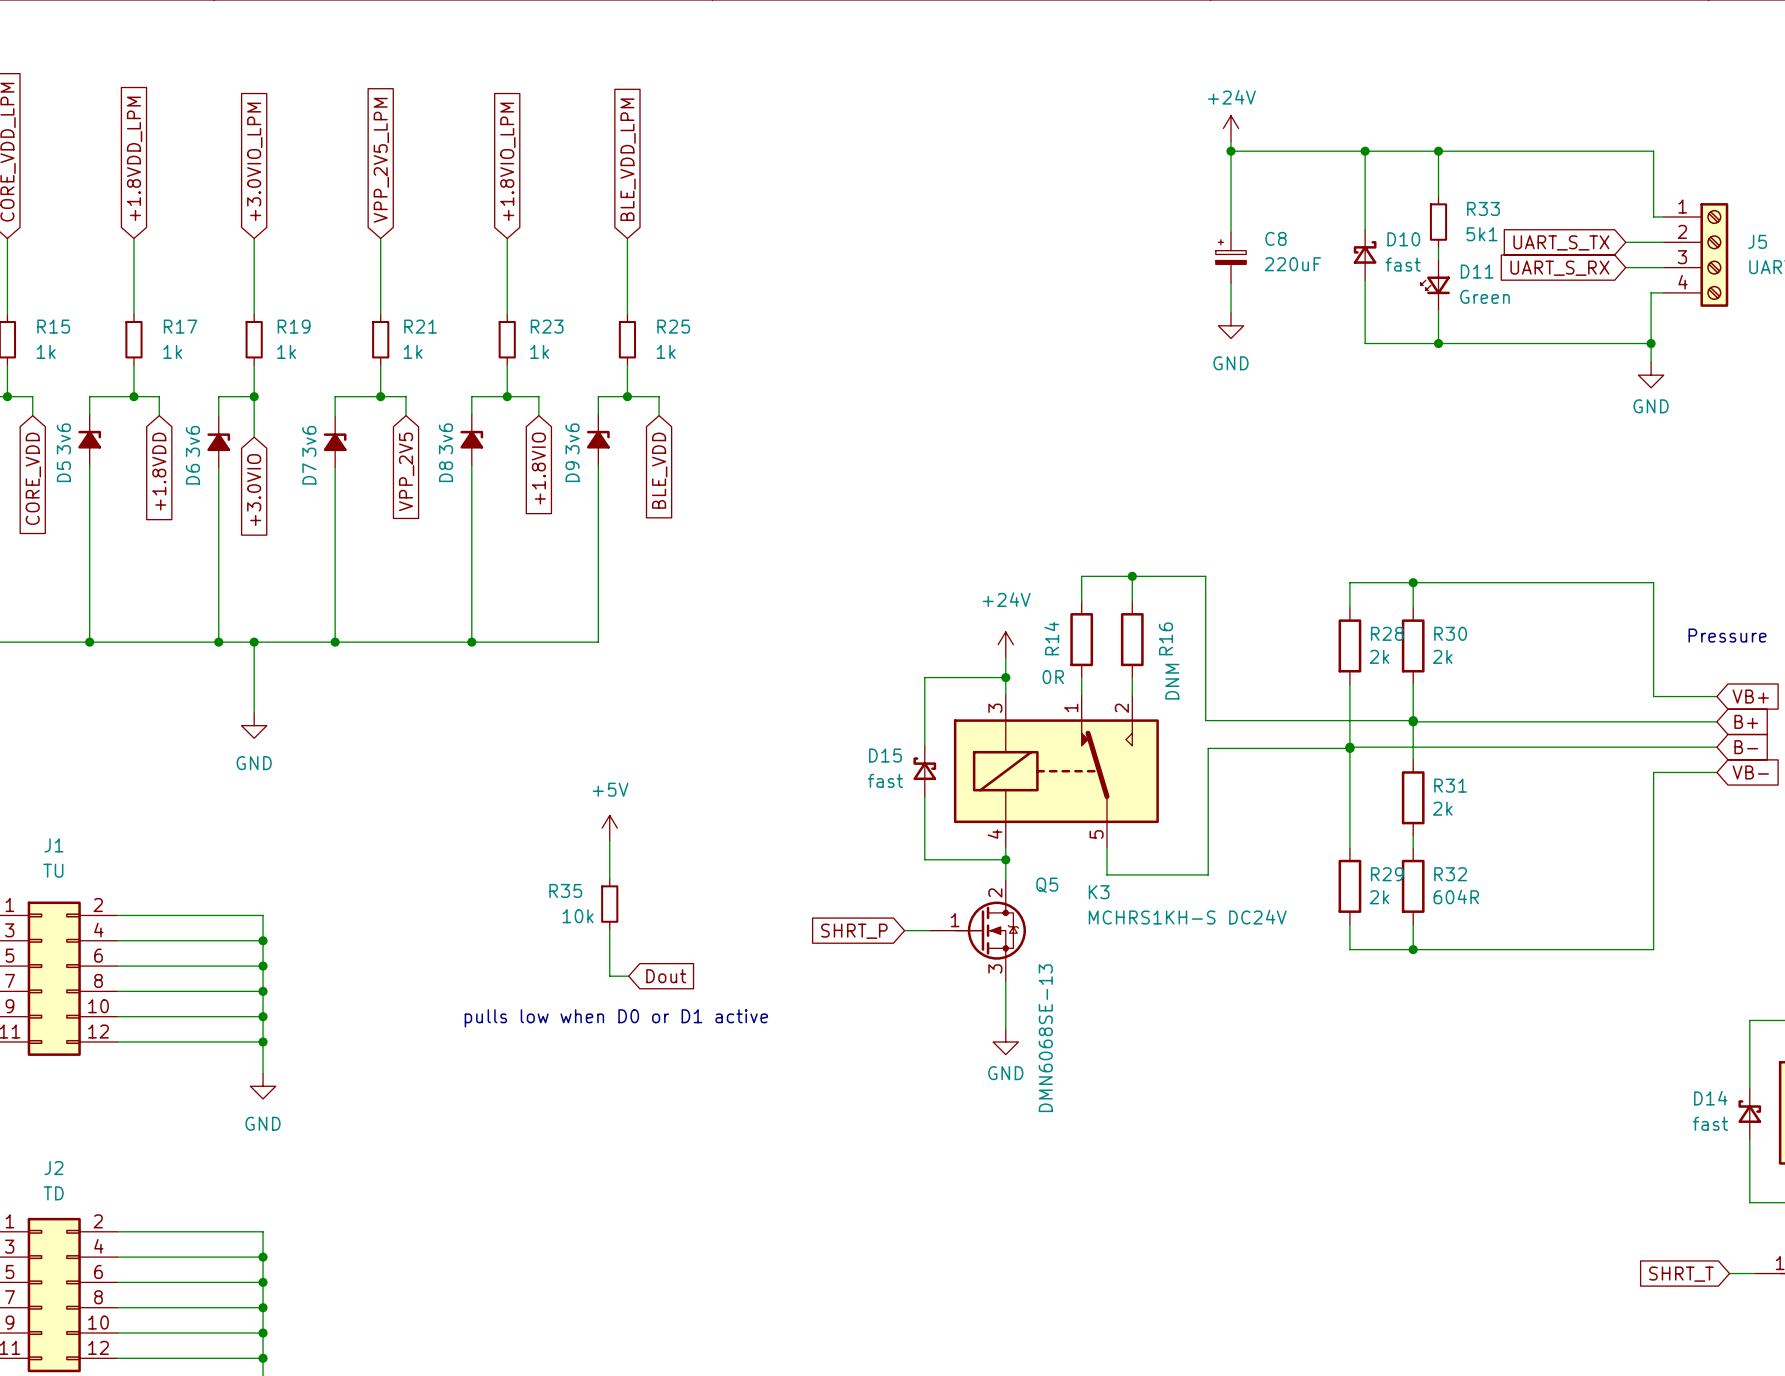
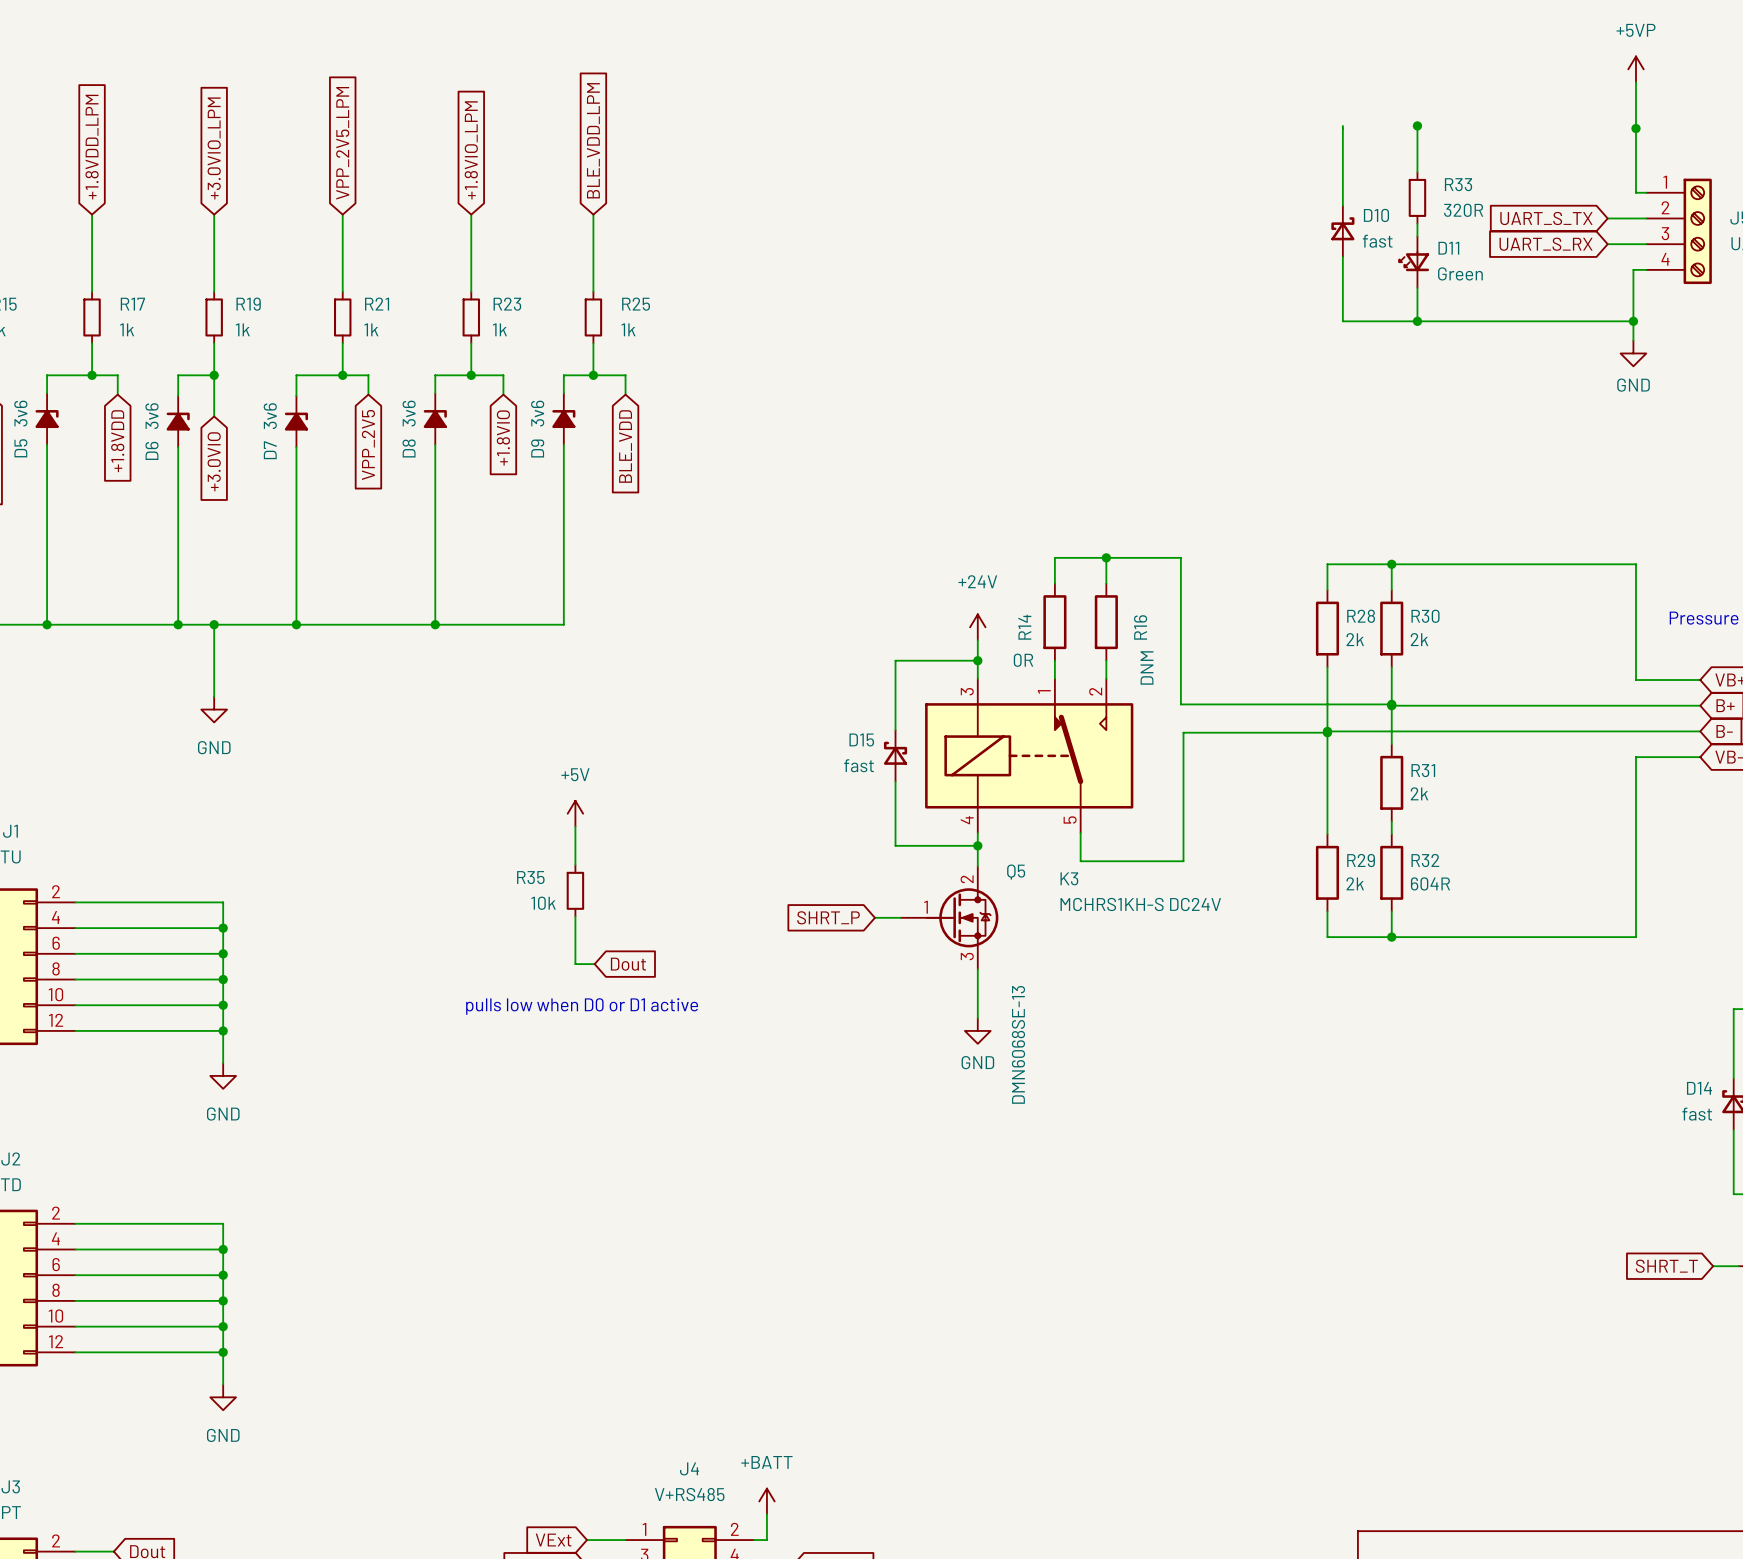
power symbol: none -> +5VP (1636, 69)
power symbol: +24V (1231, 128) -> none
wire: (1231, 141) (1231, 232) -> none
wire: (1231, 151) (1653, 151) -> (1636, 82) (1636, 125)
junction: (1231, 151) -> none
junction: (1365, 151) -> none
junction: none -> (1636, 128)
R33 value: 5k1 (1481, 234) -> 320R (1463, 210)
C8: 220uF (1231, 257) -> none
wire: (1231, 282) (1231, 313) -> none
power symbol: GND (1231, 325) -> none

